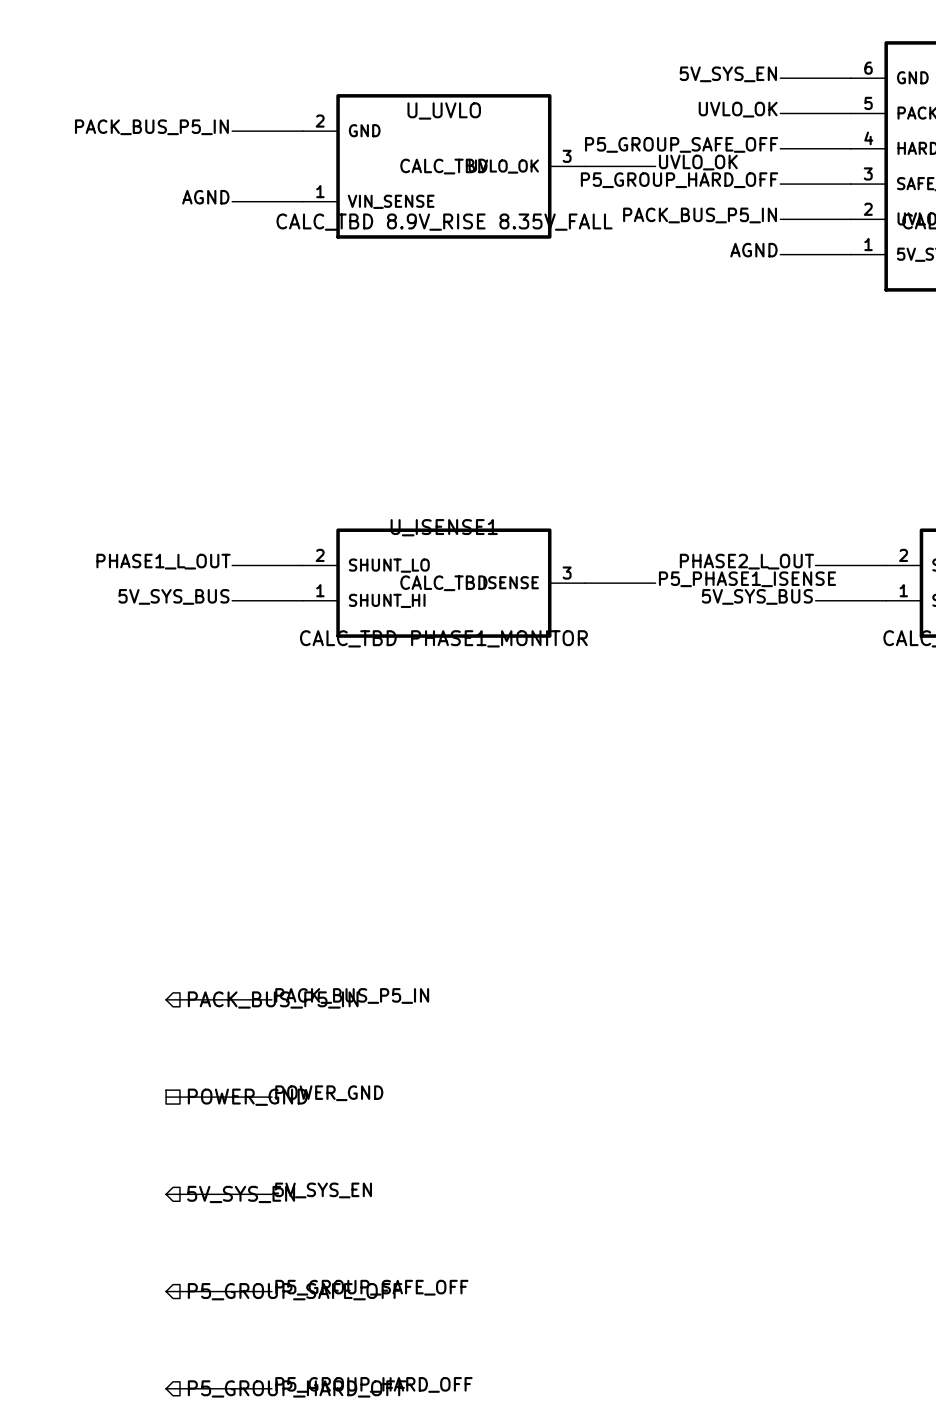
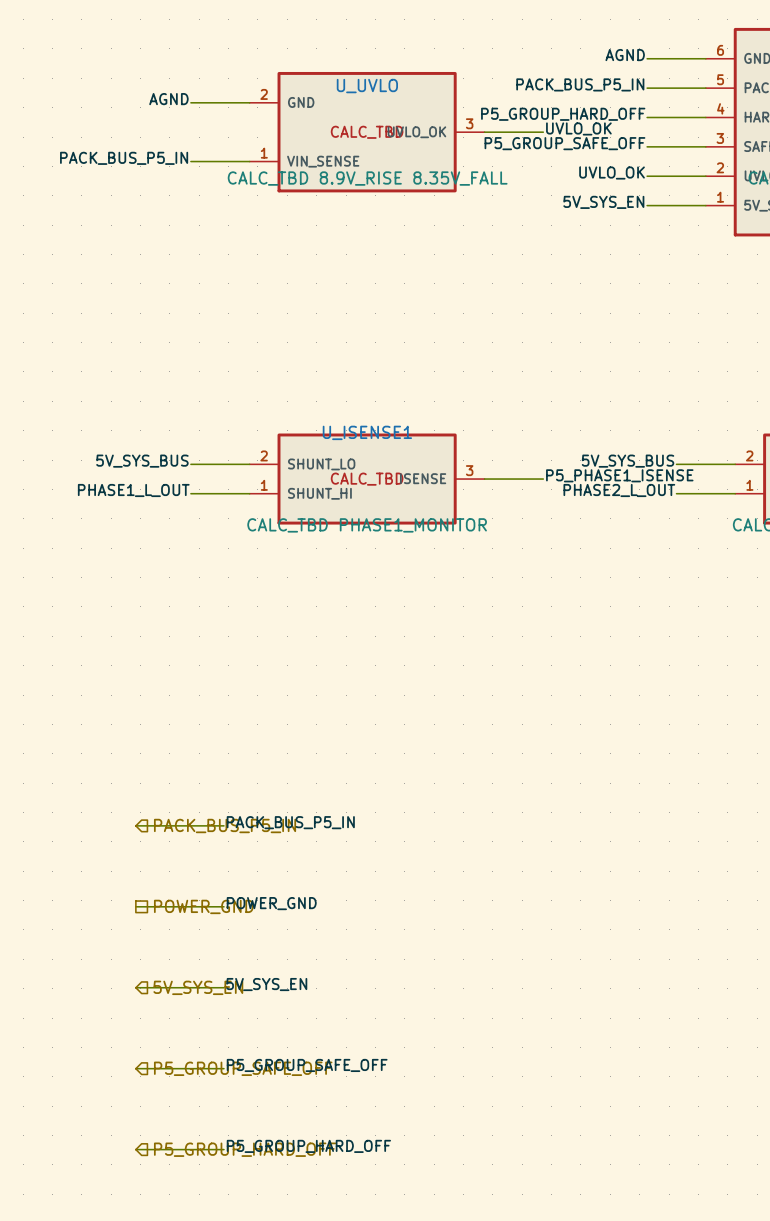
label: 5V_SYS_EN (728, 74) -> AGND (625, 55)
label: UVLO_OK (738, 109) -> PACK_BUS_P5_IN (580, 84)
label: PACK_BUS_P5_IN (151, 127) -> AGND (168, 99)
label: P5_GROUP_SAFE_OFF (681, 144) -> P5_GROUP_HARD_OFF (563, 114)
label: P5_GROUP_HARD_OFF (679, 180) -> P5_GROUP_SAFE_OFF (564, 143)
label: AGND (205, 197) -> PACK_BUS_P5_IN (124, 158)
label: PACK_BUS_P5_IN (700, 215) -> UVLO_OK (612, 173)
label: AGND (753, 250) -> 5V_SYS_EN (603, 202)
label: PHASE1_L_OUT (163, 561) -> 5V_SYS_BUS (142, 461)
label: PHASE2_L_OUT (746, 561) -> 5V_SYS_BUS (628, 461)
label: 5V_SYS_BUS (173, 596) -> PHASE1_L_OUT (133, 490)
label: 5V_SYS_BUS (757, 596) -> PHASE2_L_OUT (619, 490)

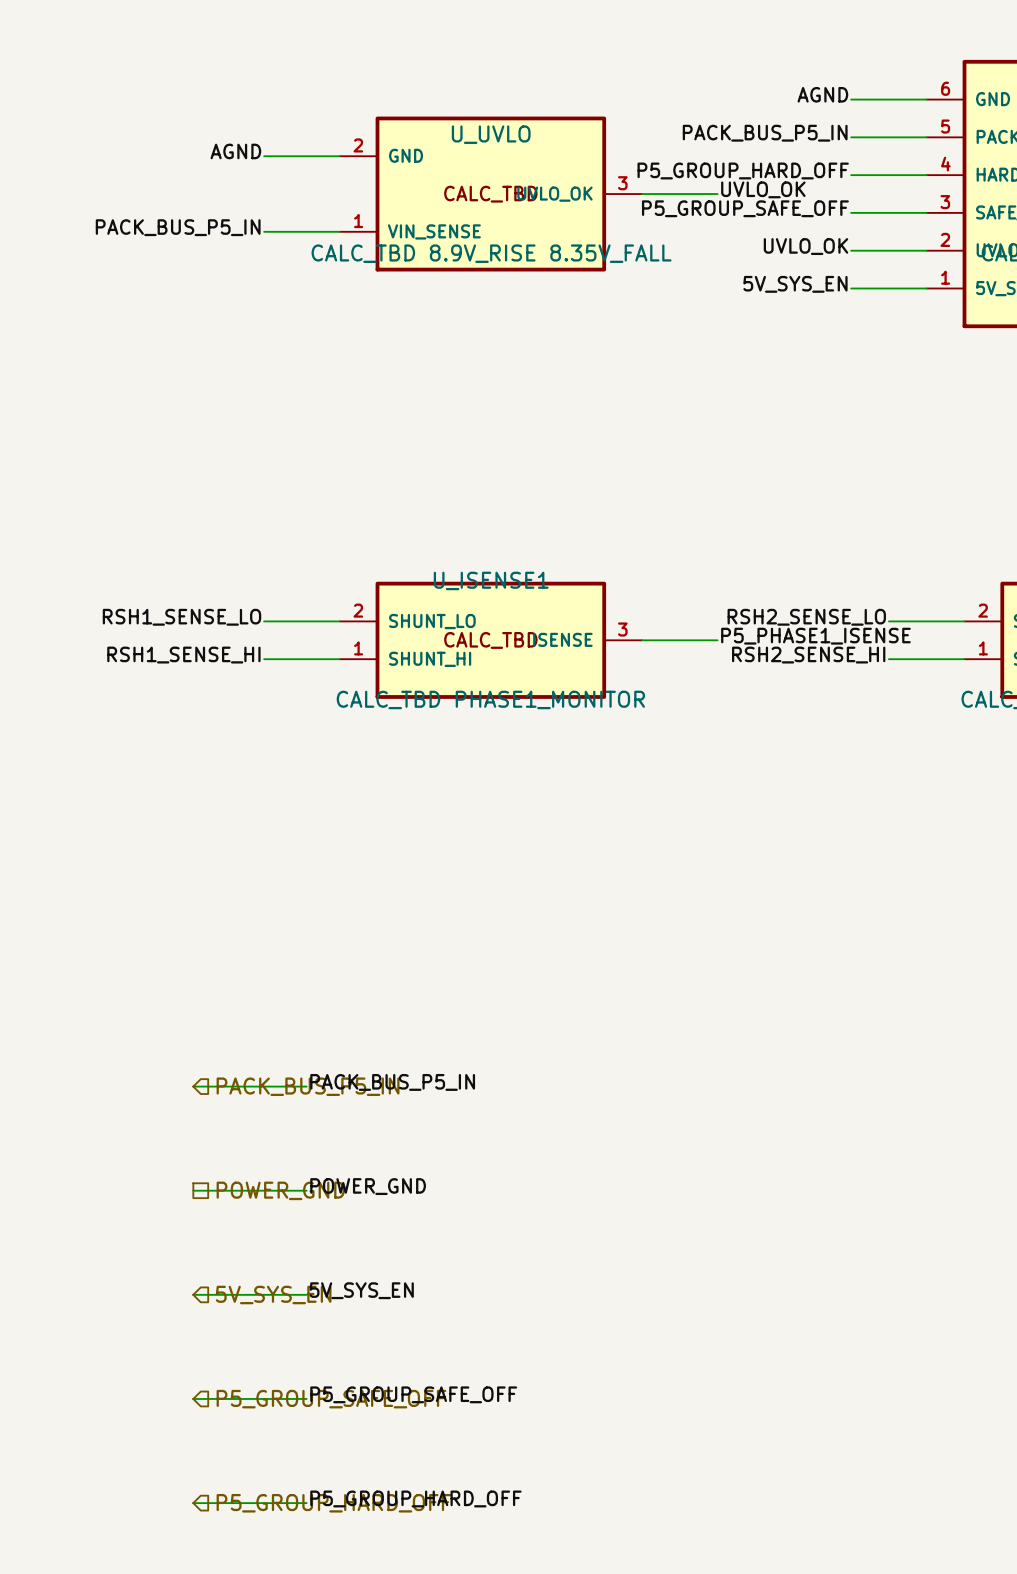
label: 5V_SYS_BUS (142, 461) -> RSH1_SENSE_LO (181, 617)
label: 5V_SYS_BUS (628, 461) -> RSH2_SENSE_LO (806, 617)
label: PHASE1_L_OUT (133, 490) -> RSH1_SENSE_HI (183, 655)
label: PHASE2_L_OUT (619, 490) -> RSH2_SENSE_HI (808, 655)

